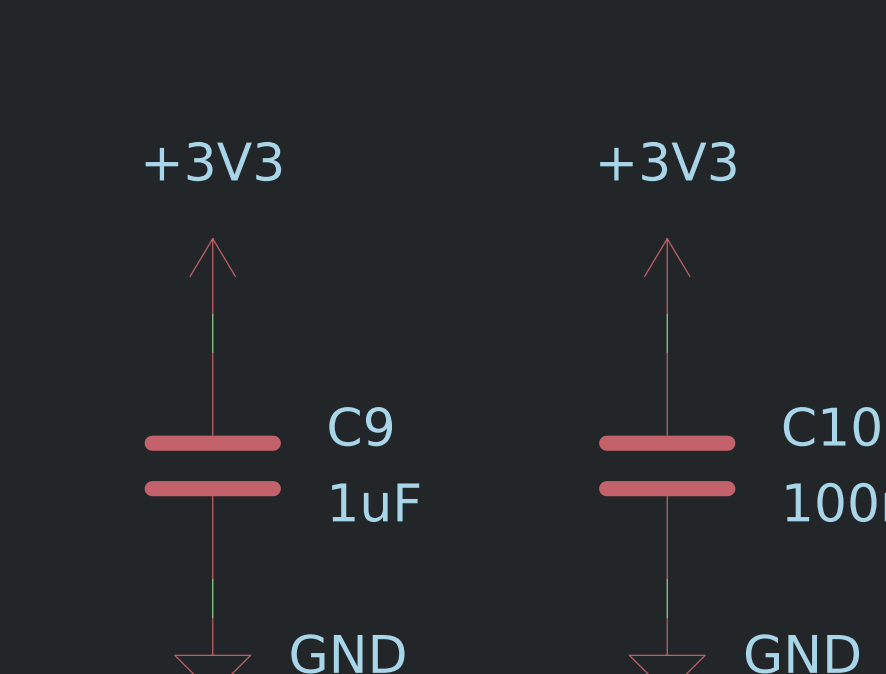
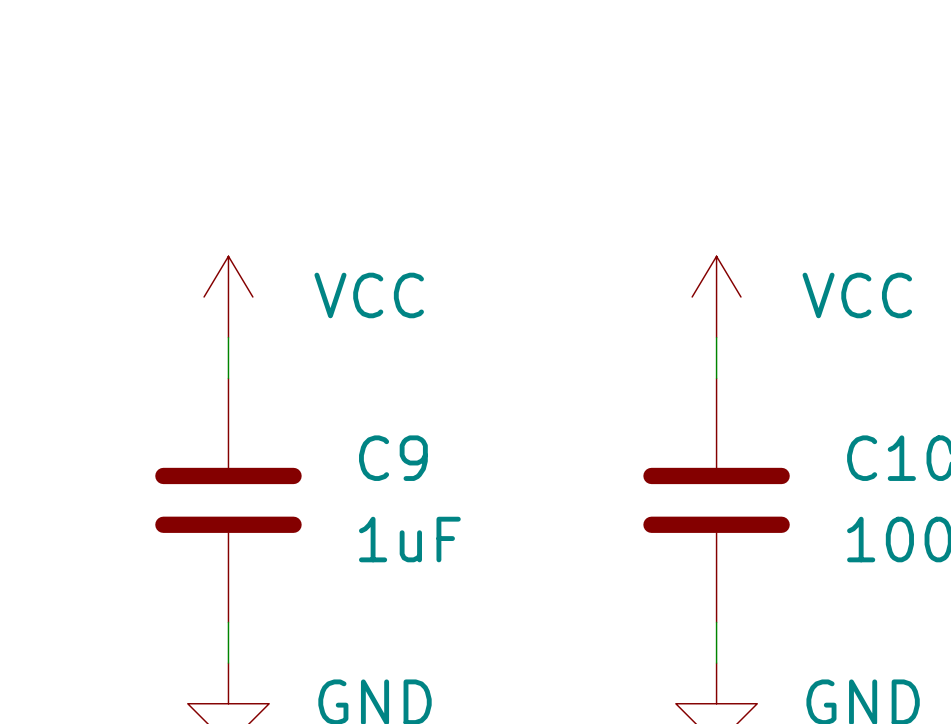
power symbol: +3V3 (212, 276) -> VCC (228, 297)
power symbol: +3V3 (667, 276) -> VCC (716, 297)

